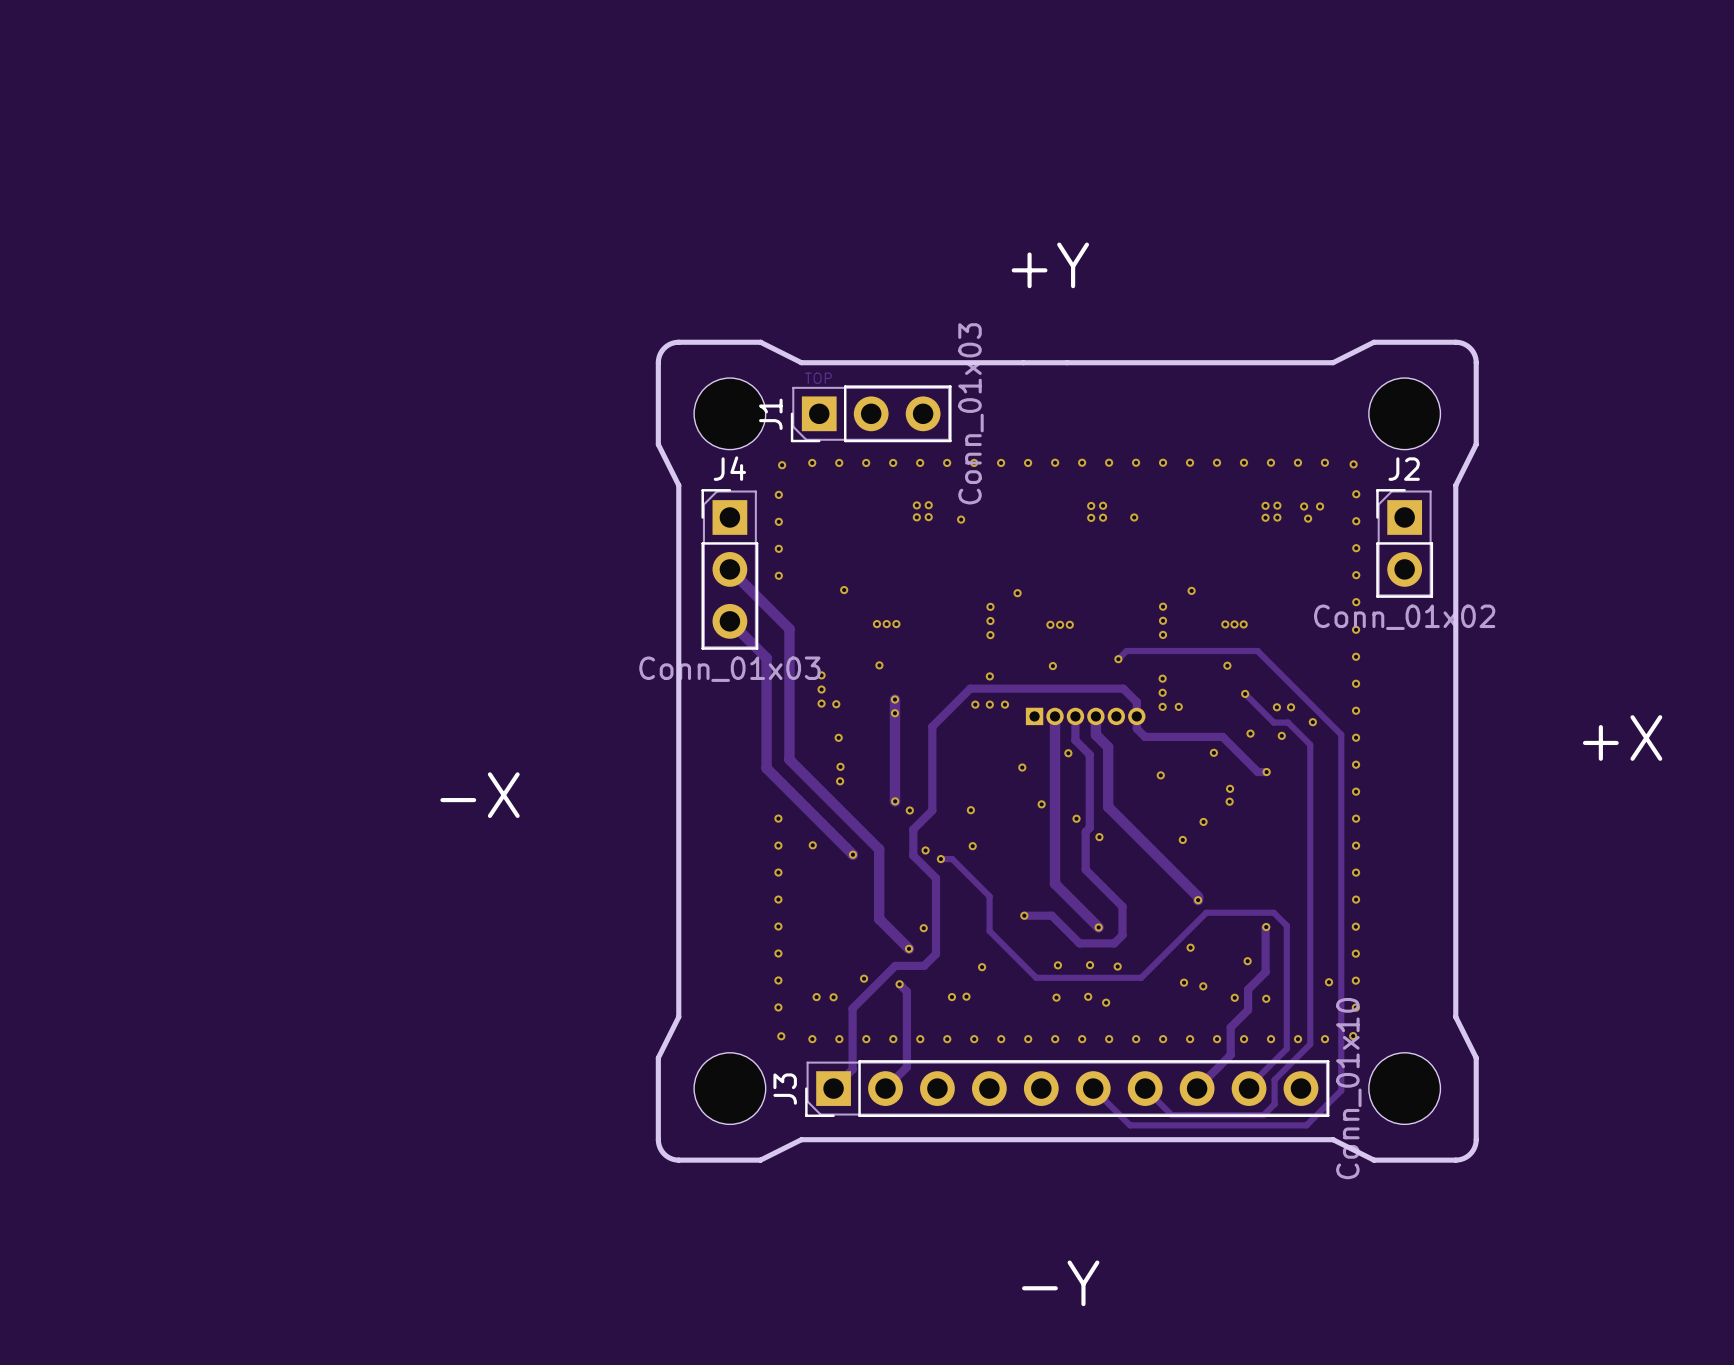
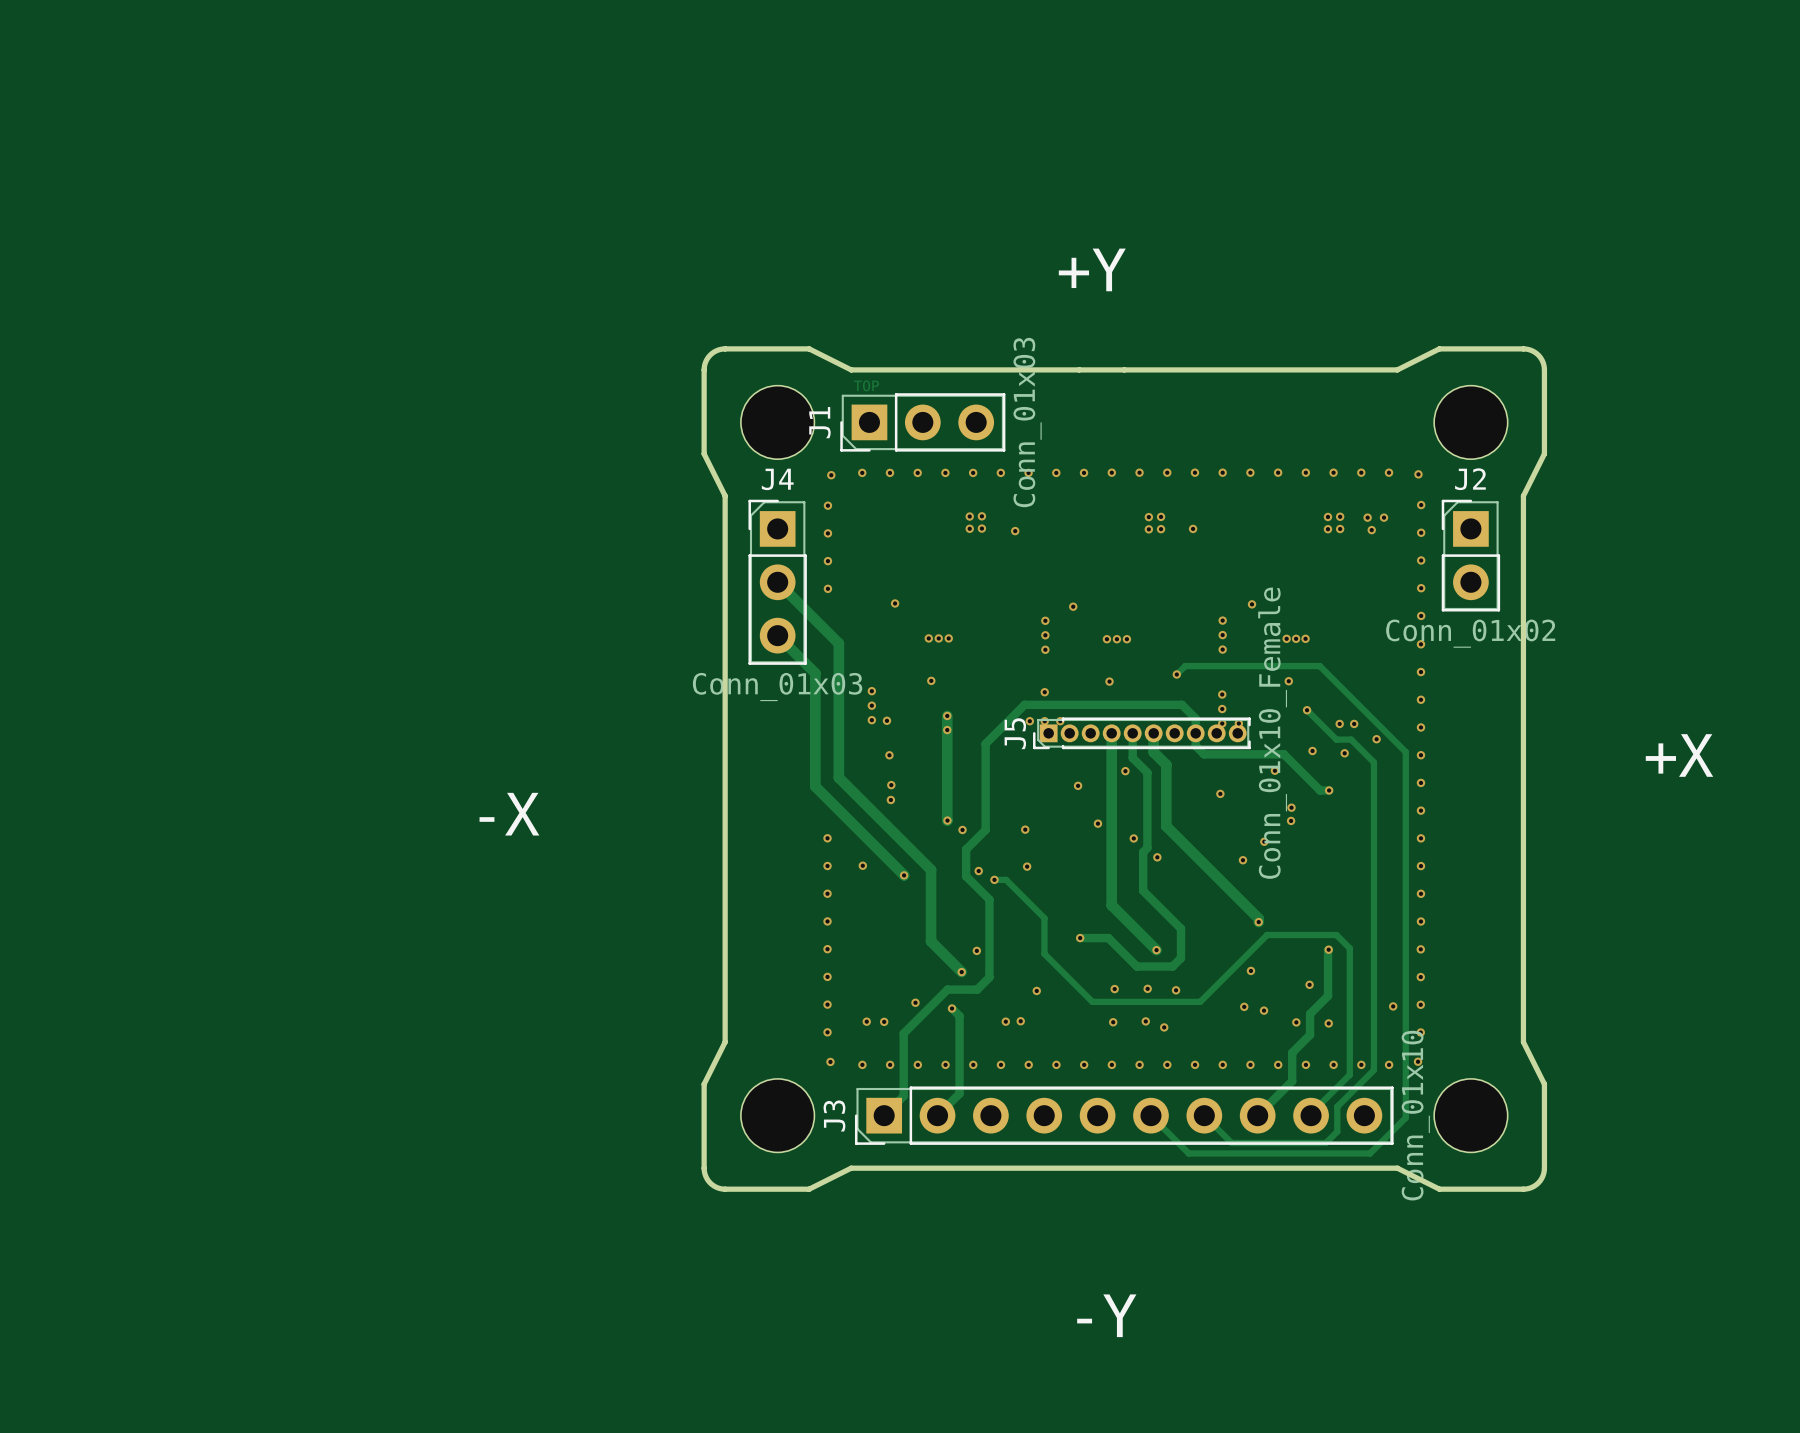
J5: none -> Conn_01x10_Female (1141, 733)
part: (1085, 716) -> none

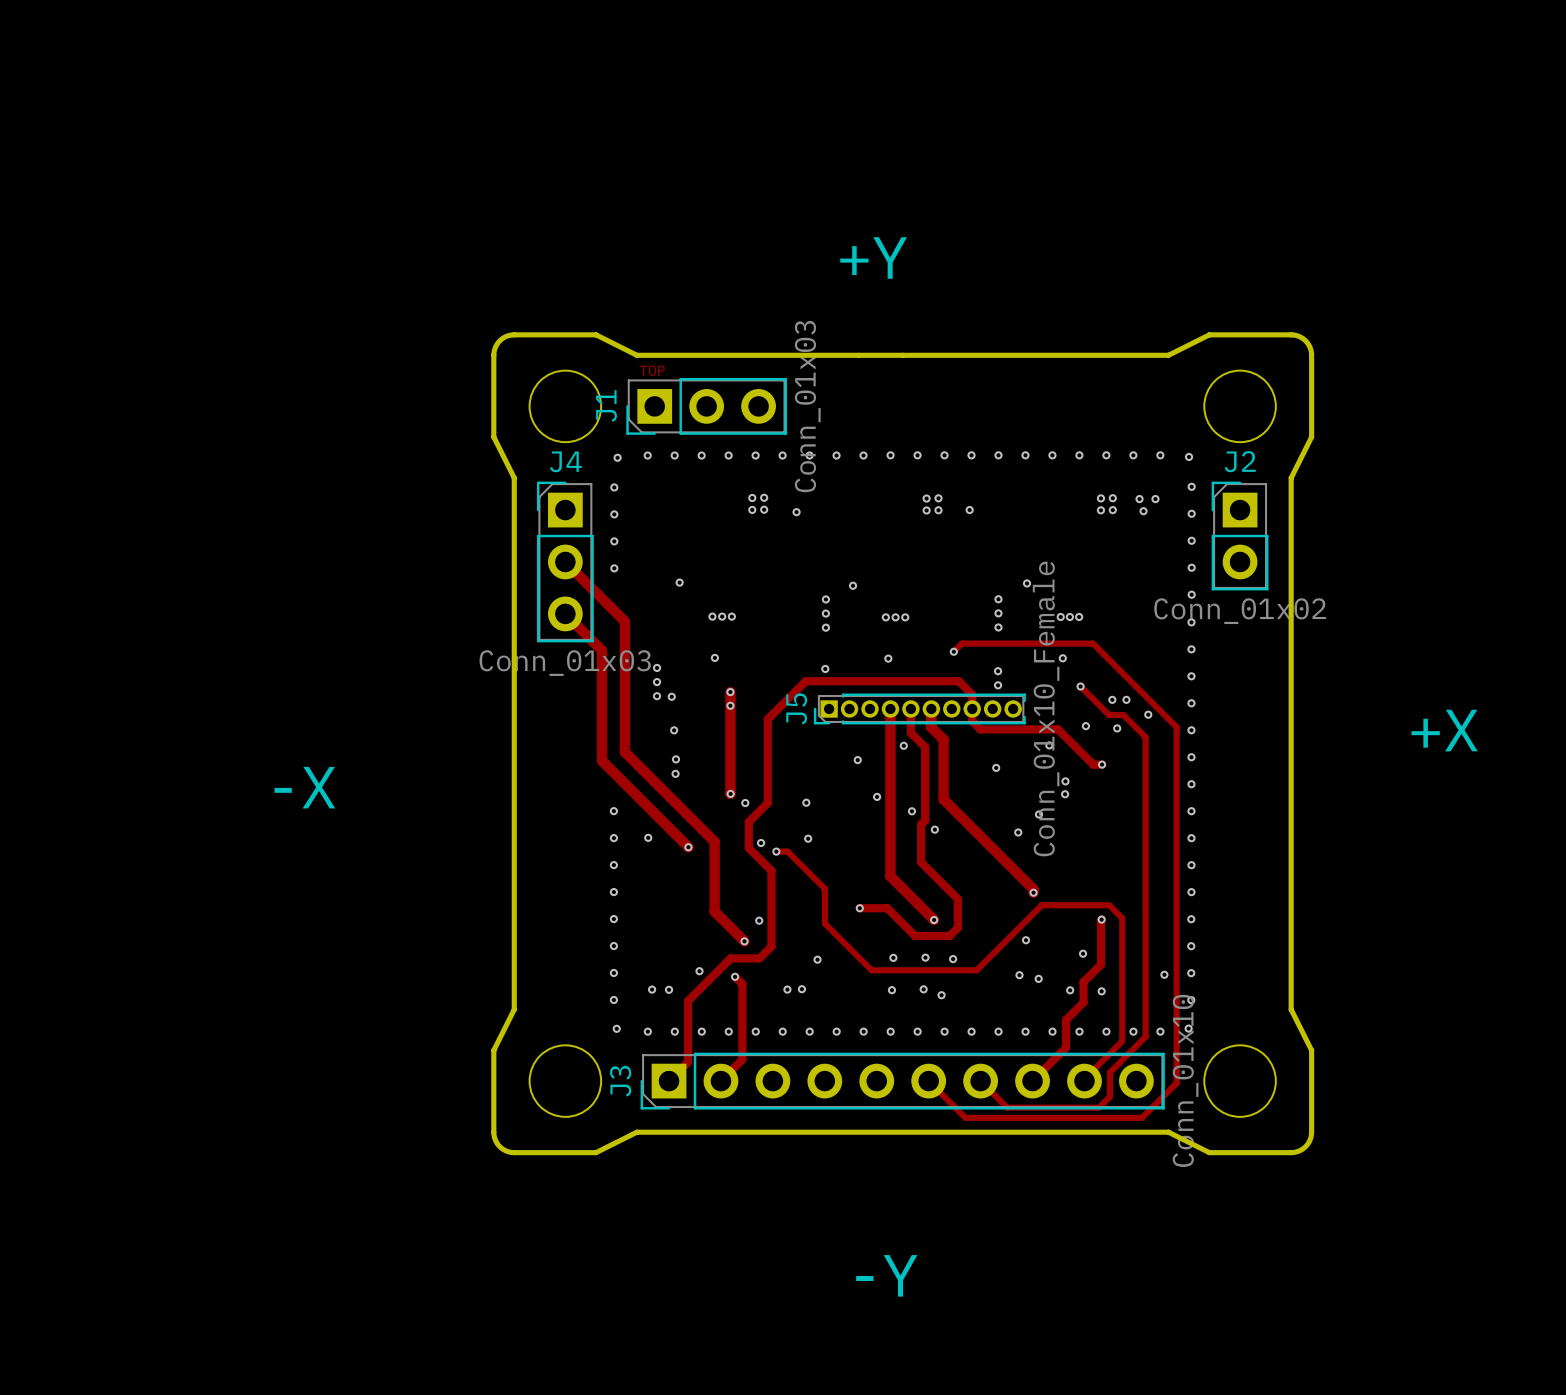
via: (1029, 721) -> none
via: (1044, 721) -> none
via: (1060, 721) -> none
via: (1222, 723) -> none
via: (1238, 723) -> none

